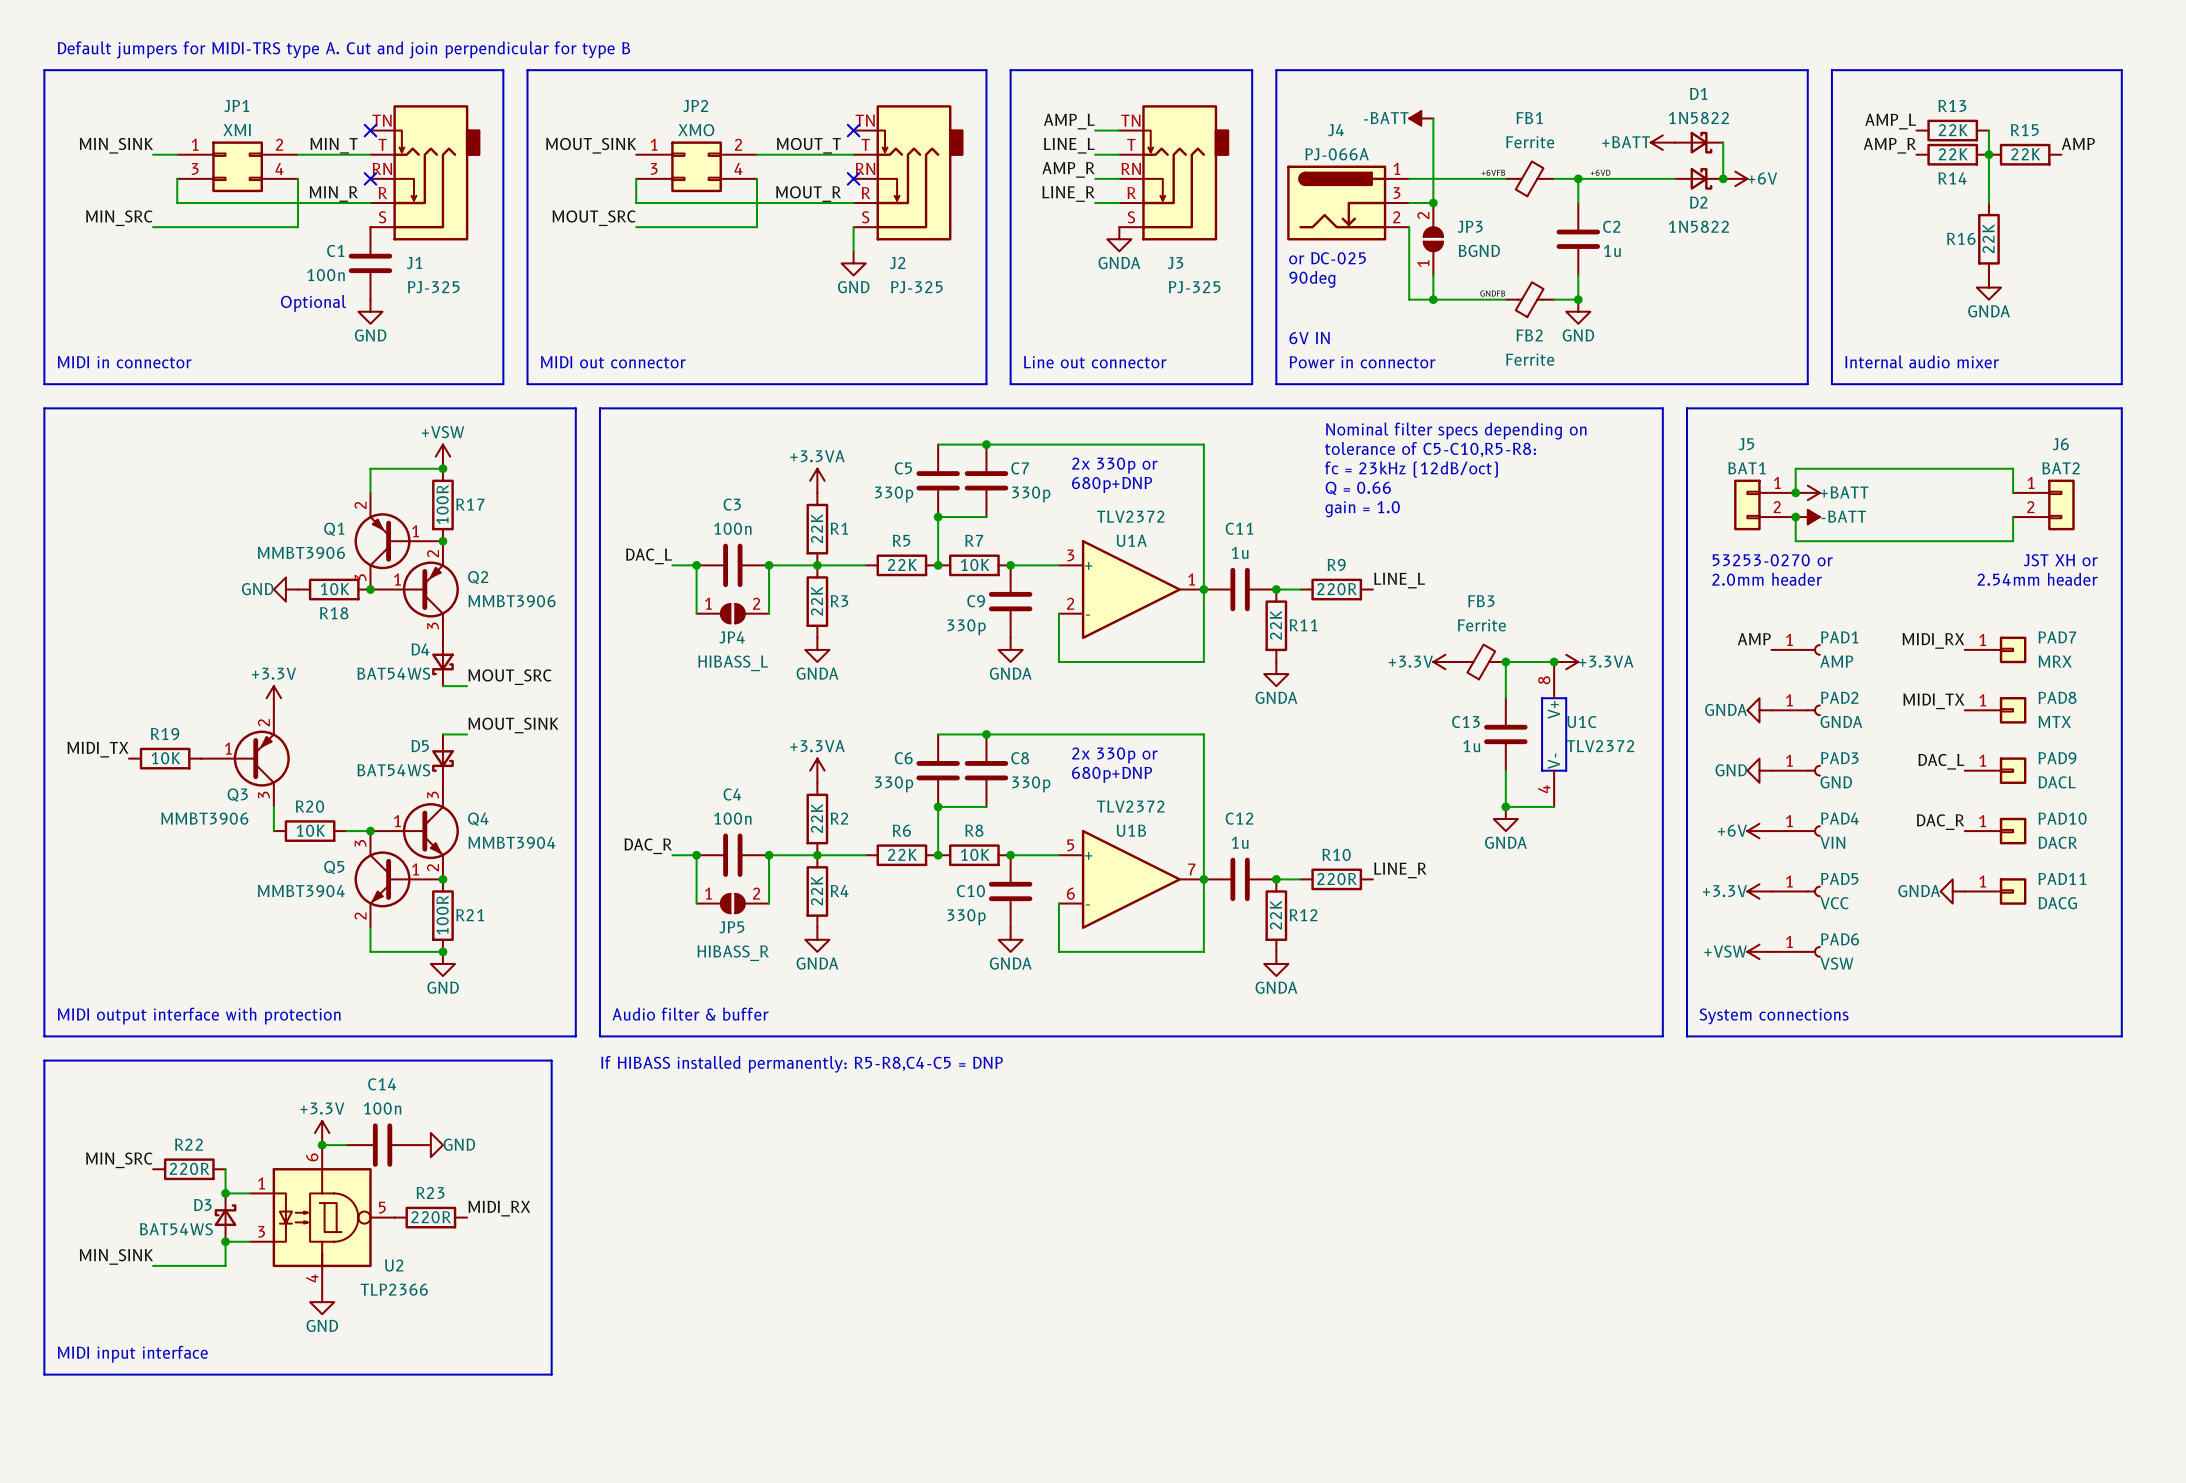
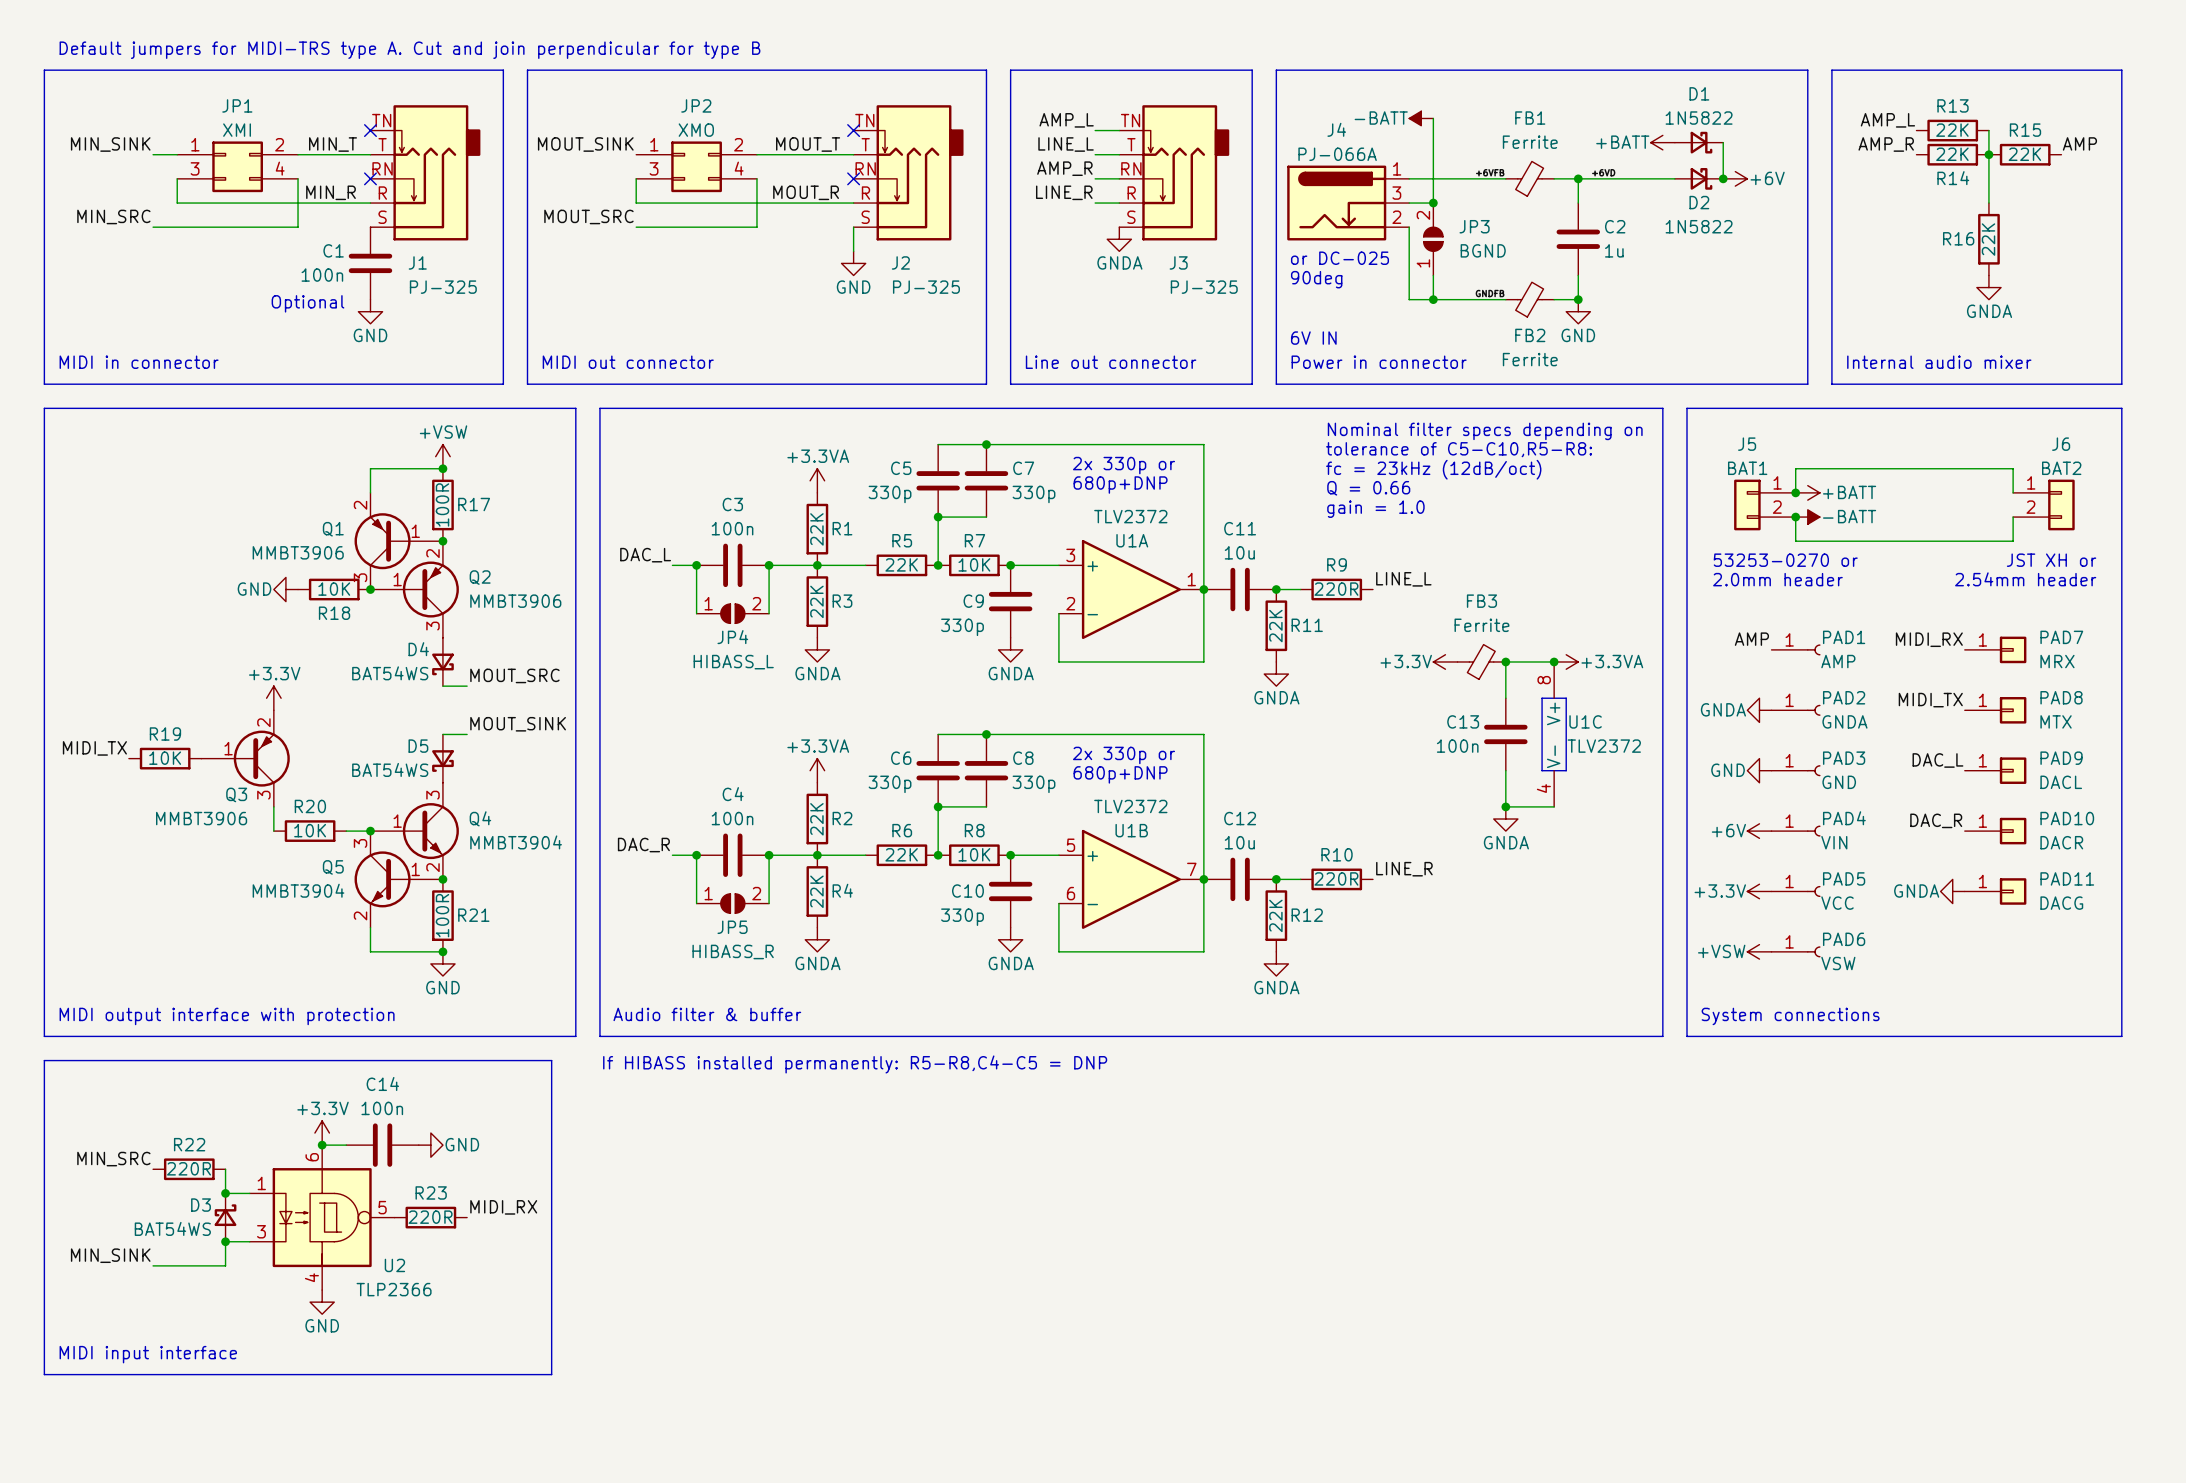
C11 value: 1u (1240, 552) -> 10u (1239, 552)
C13 value: 1u (1471, 746) -> 100n (1457, 746)
C12 value: 1u (1240, 842) -> 10u (1239, 842)

